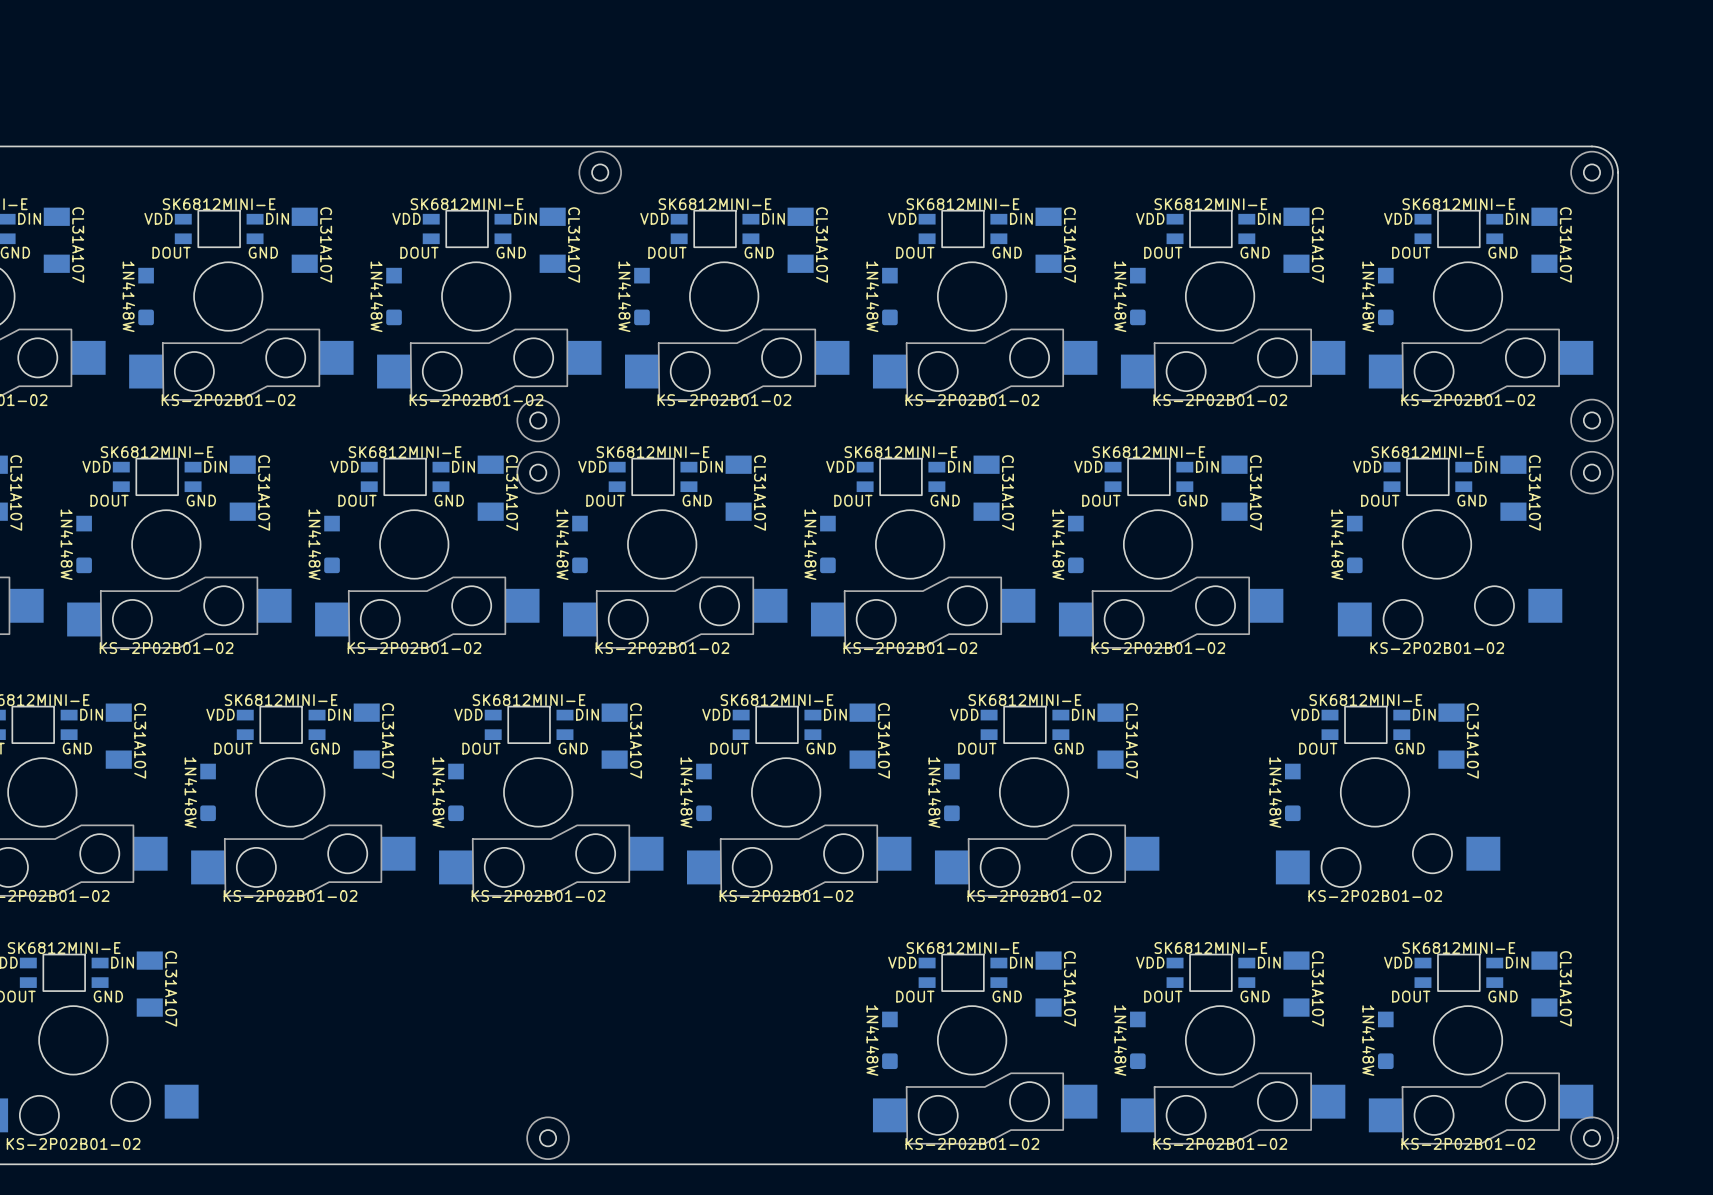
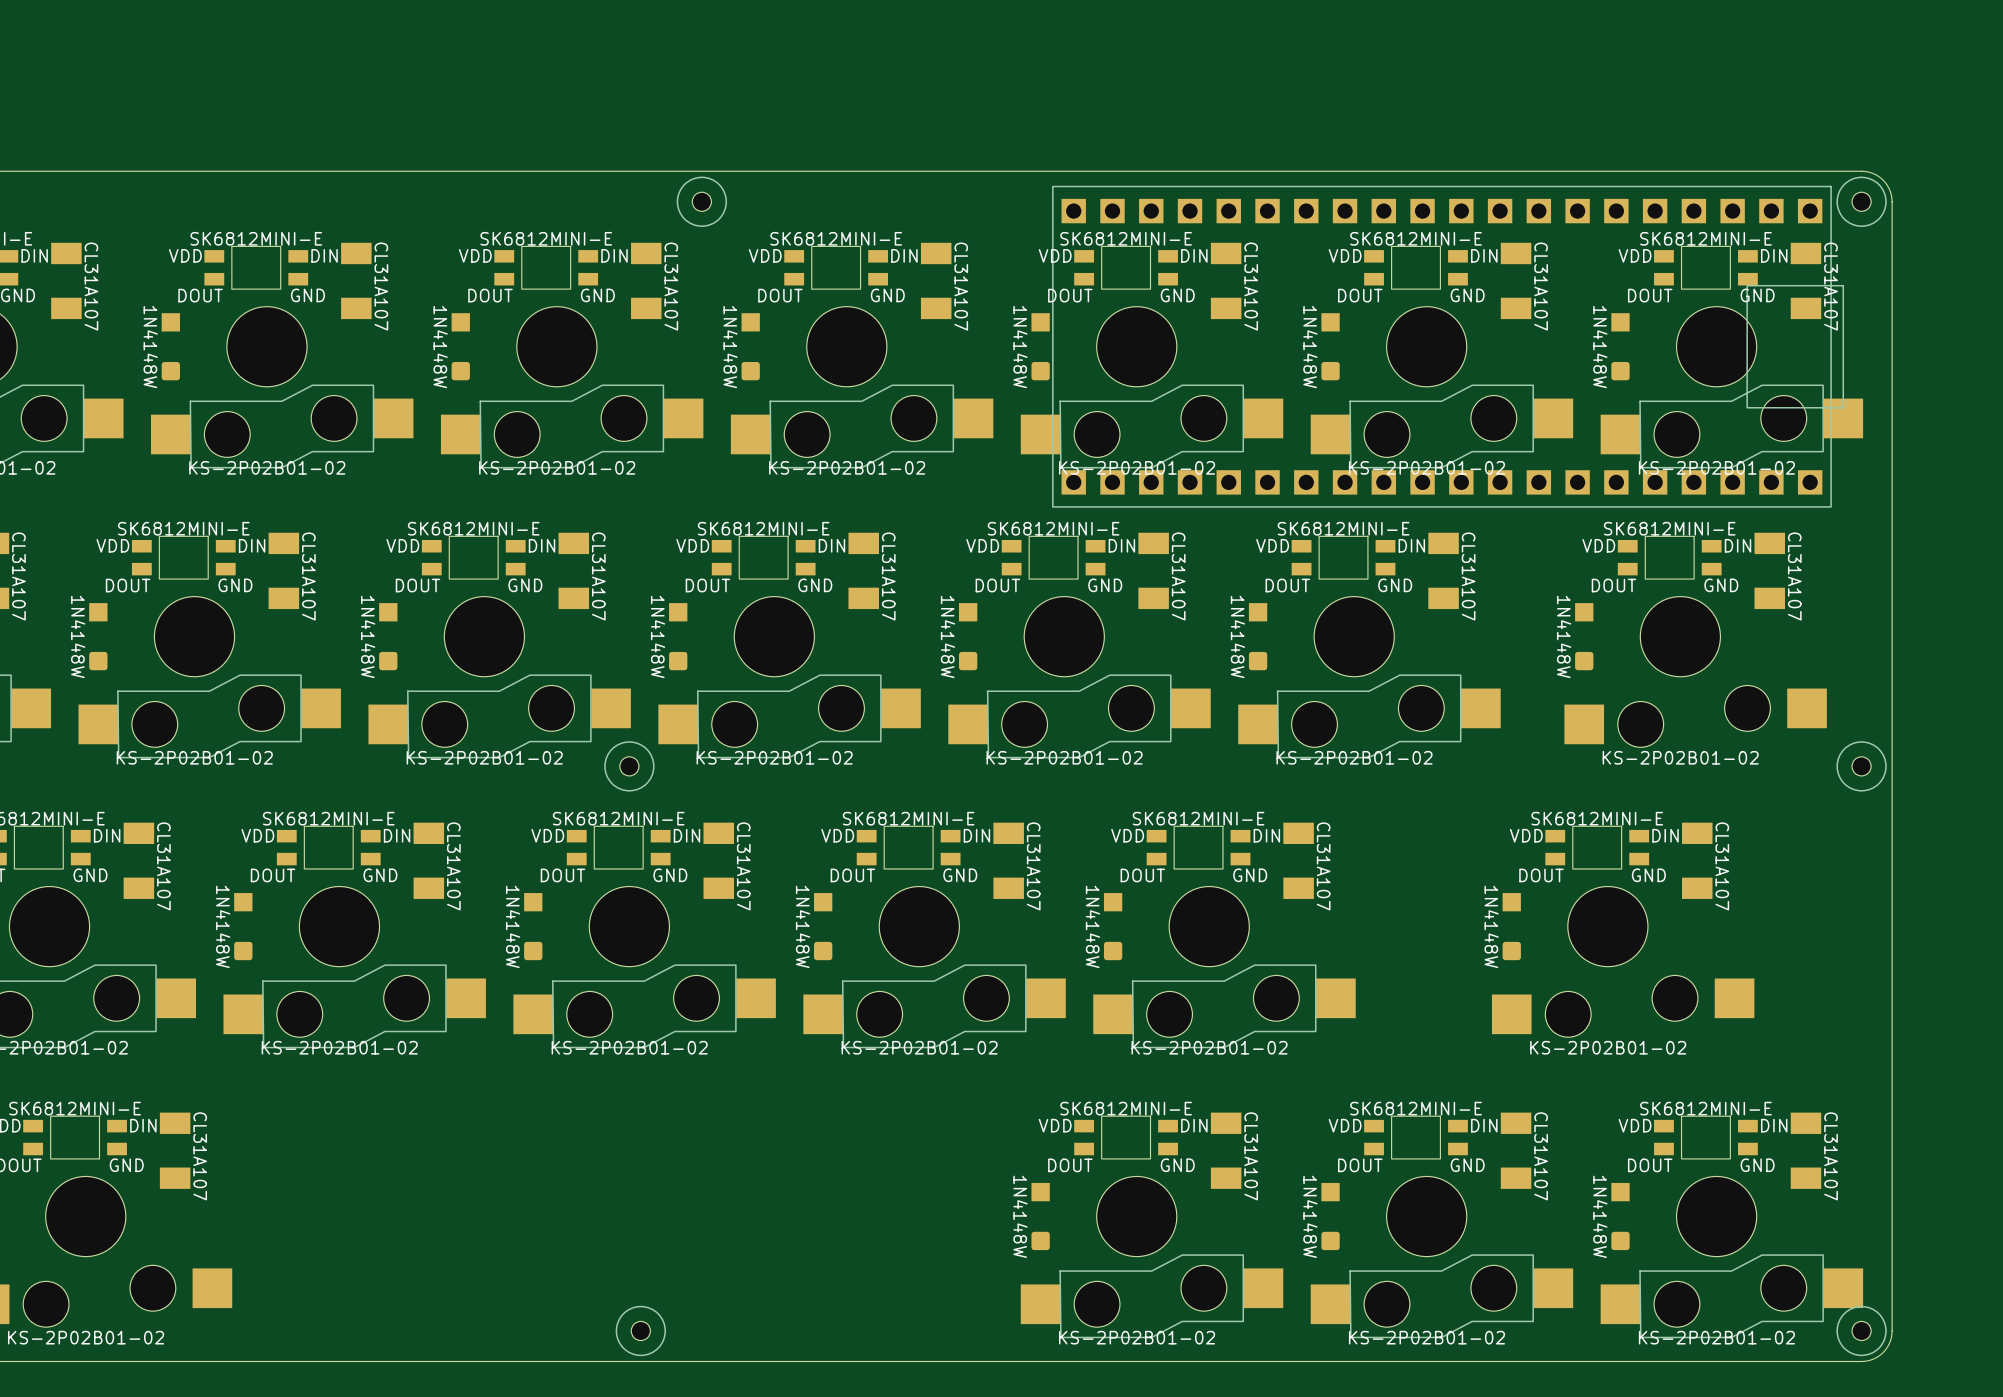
part: none -> (1448, 346)
part: (538, 420) -> none
part: (1591, 420) -> none
part: (538, 472) -> none
part: (1591, 472) -> none
part: none -> (629, 766)
part: none -> (1861, 766)

